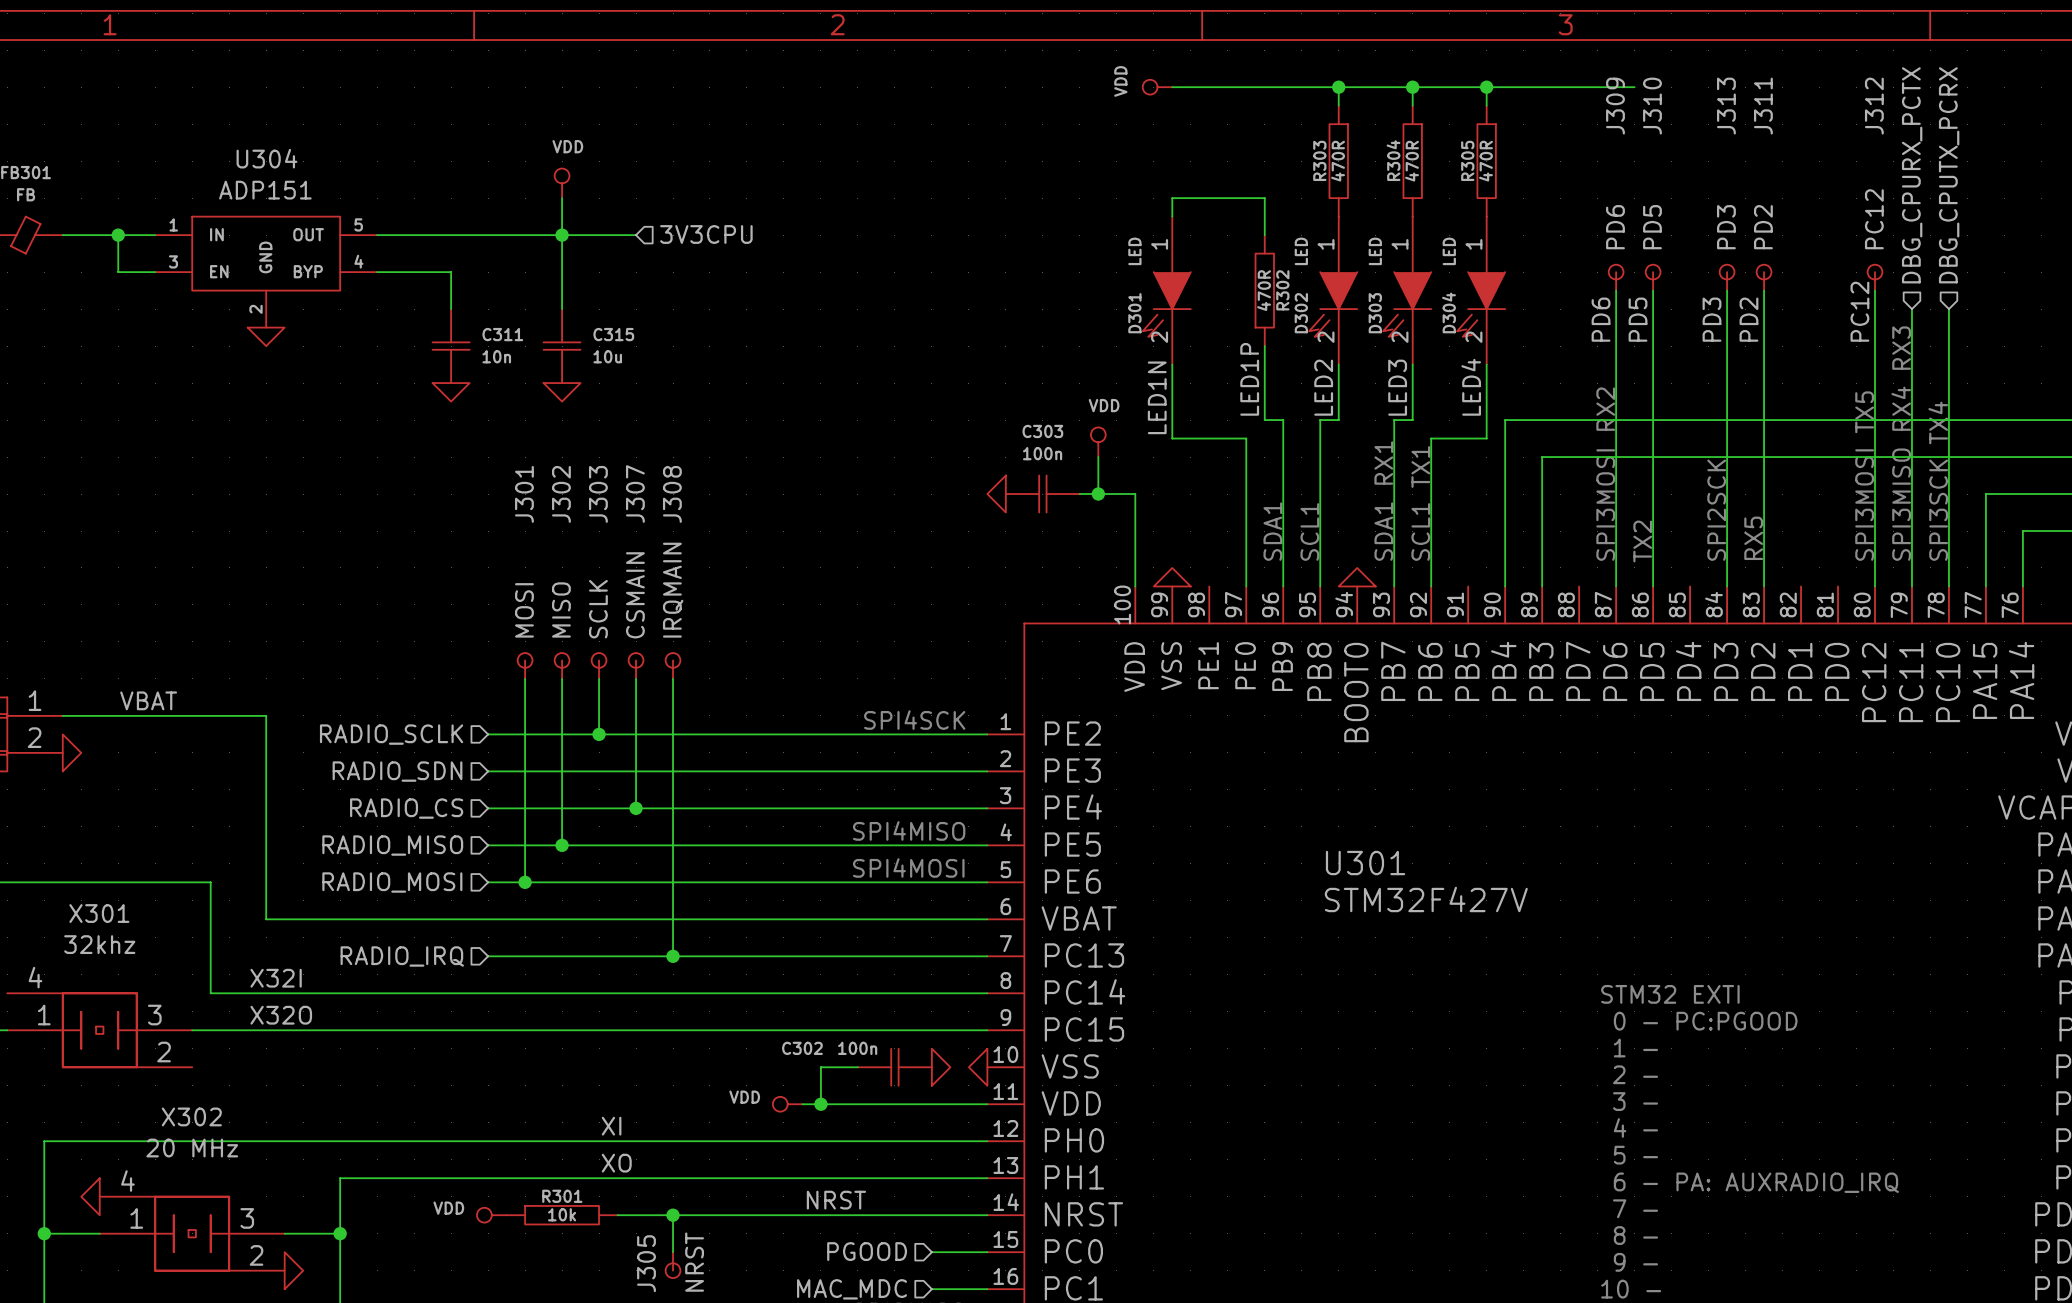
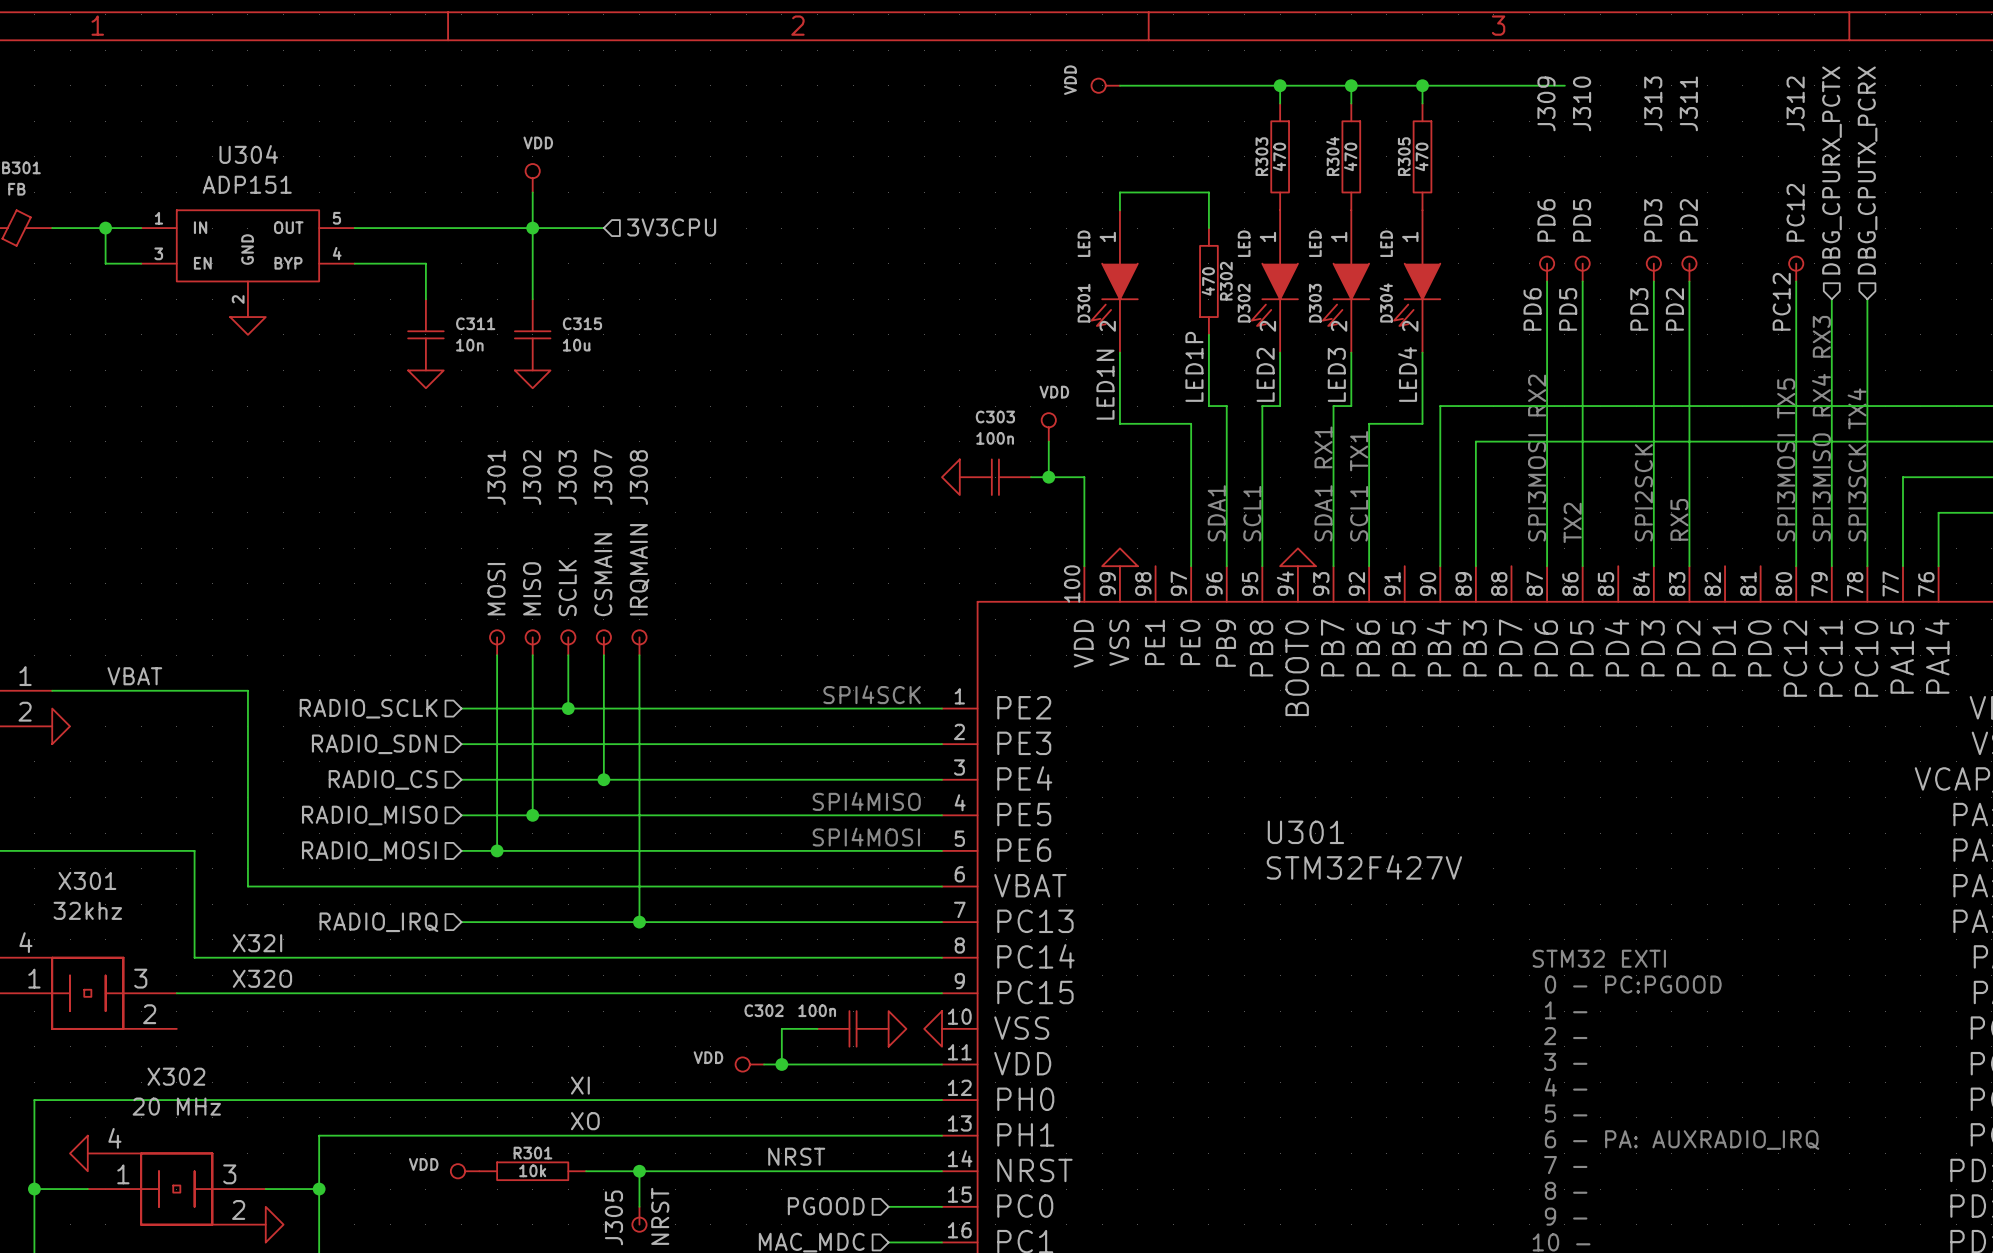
R303 value: 470R (1338, 161) -> 470 (1279, 156)
R304 value: 470R (1412, 161) -> 470 (1350, 156)
R305 value: 470R (1485, 161) -> 470 (1421, 156)
R302 value: 470R (1264, 290) -> 470 (1208, 281)

